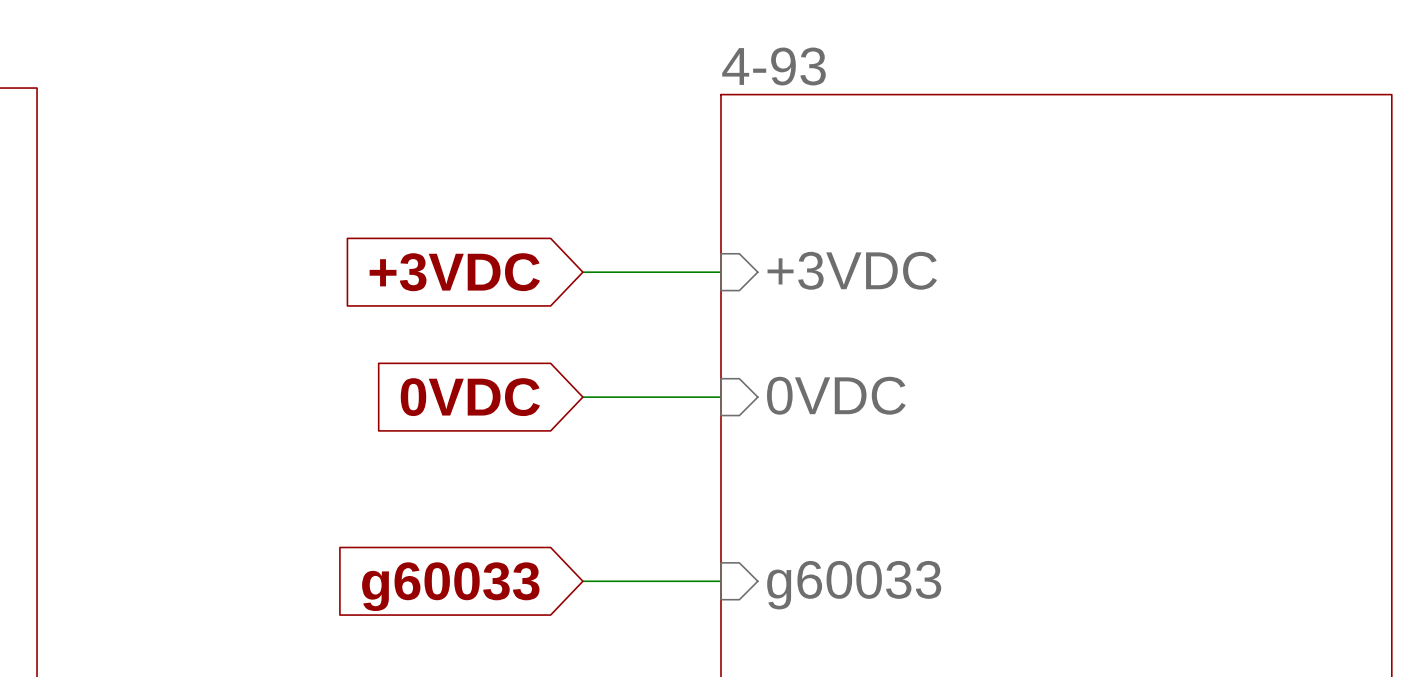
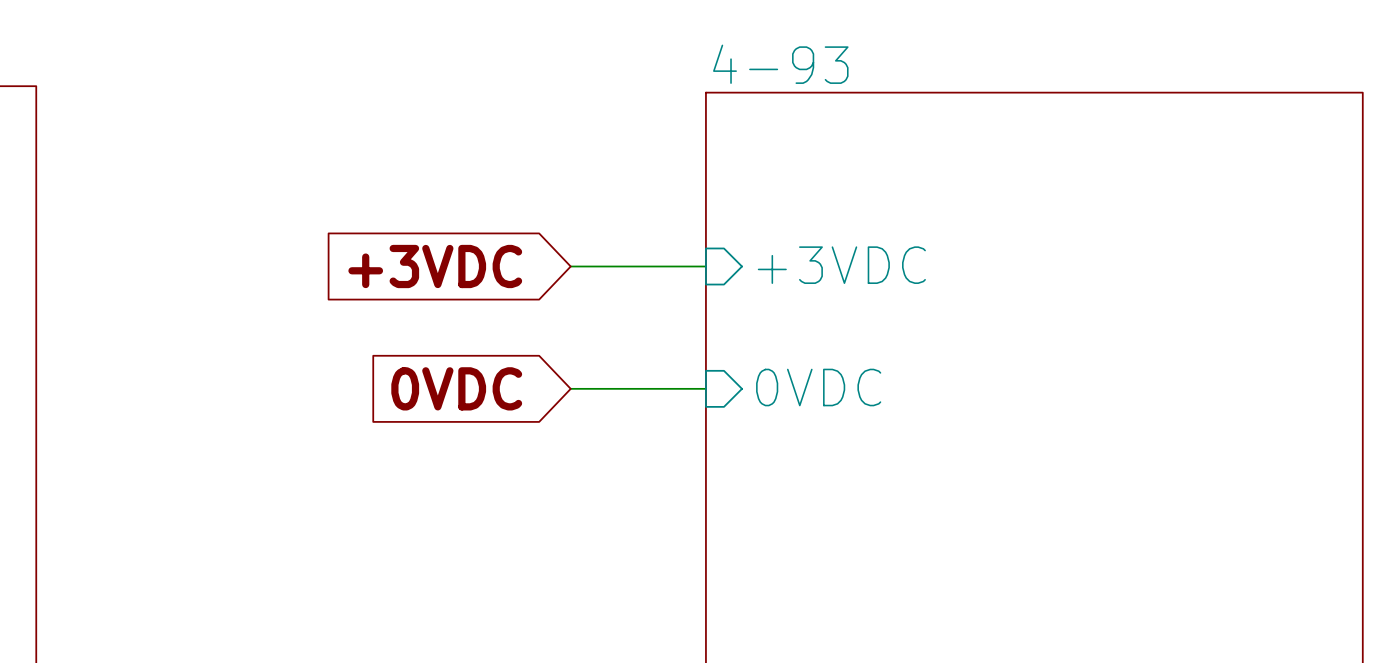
wire: (582, 581) (720, 581) -> none
sheet pin: g60033 (854, 585) -> none
global label: g60033 (450, 586) -> none

